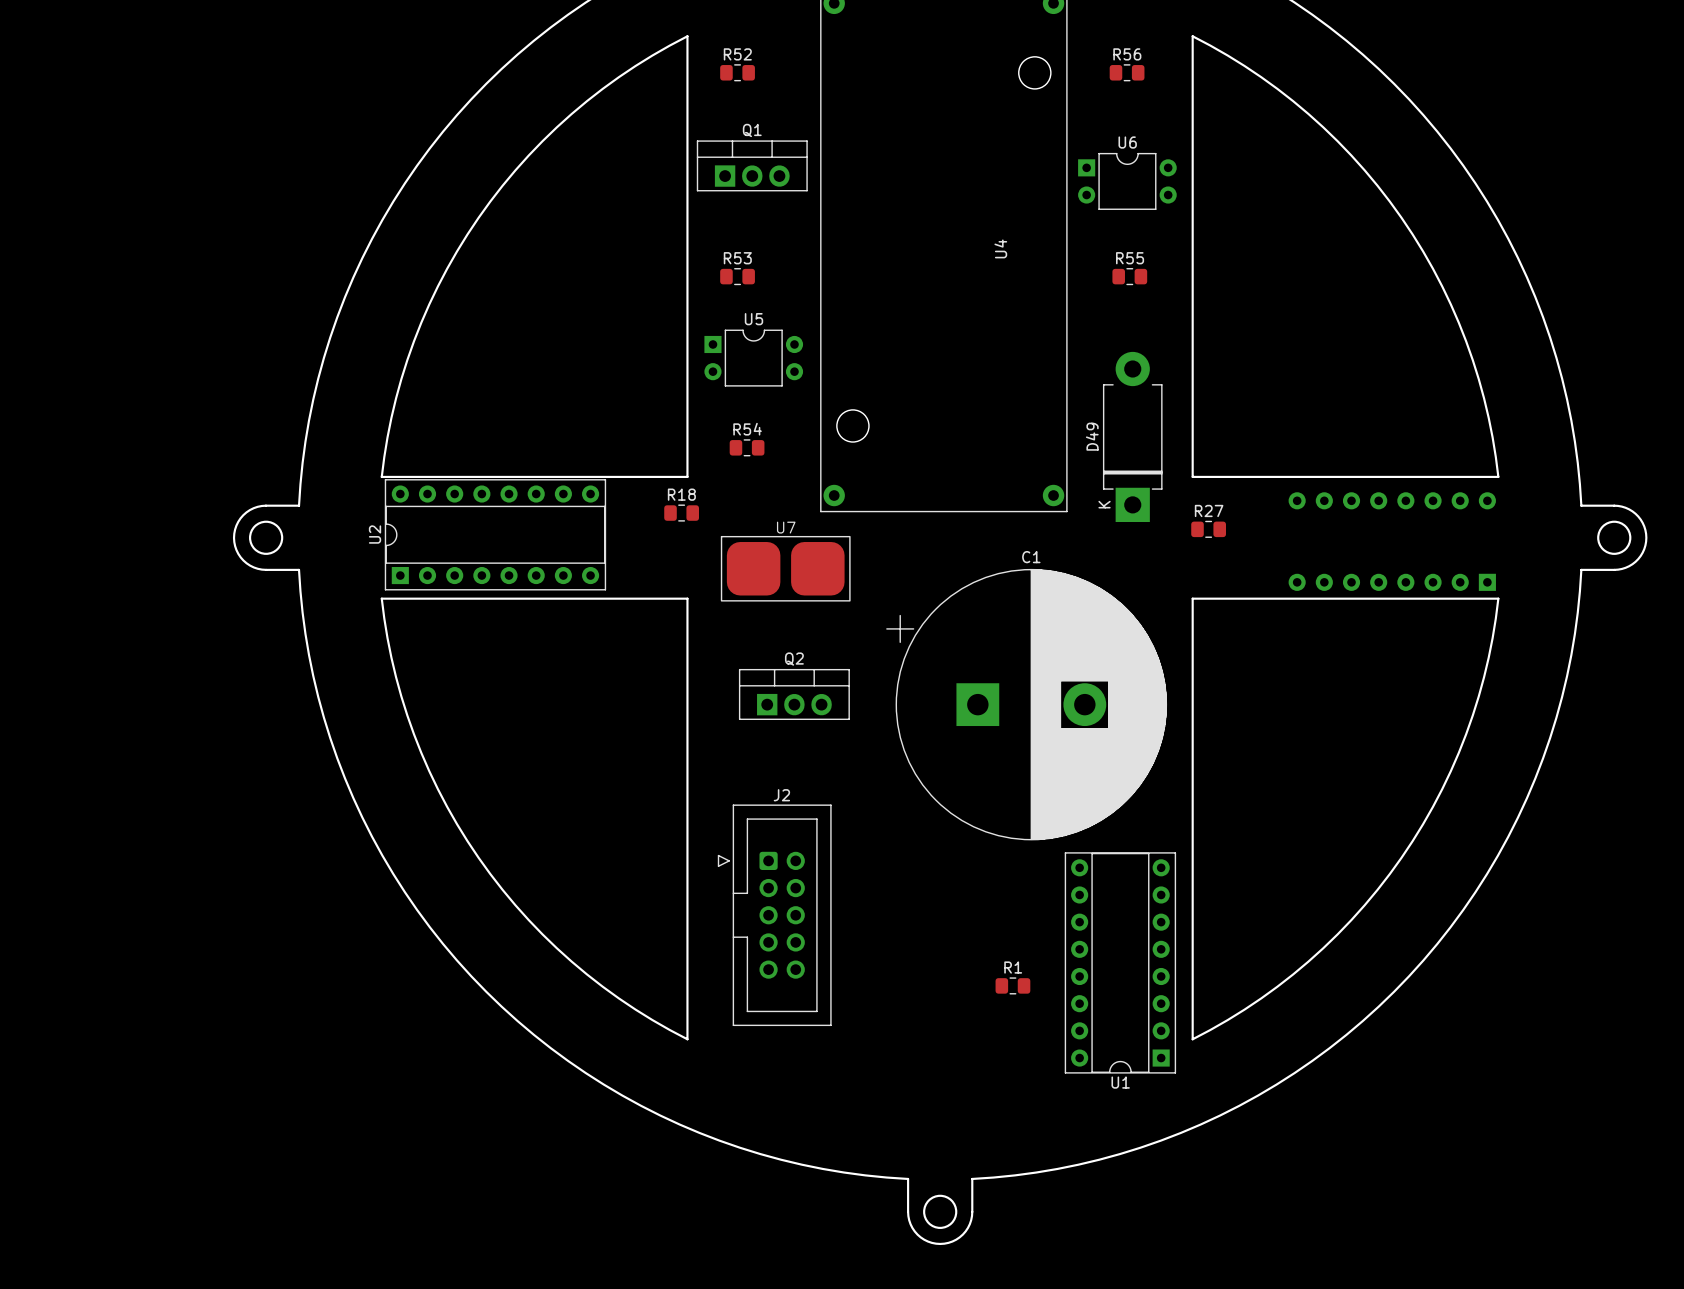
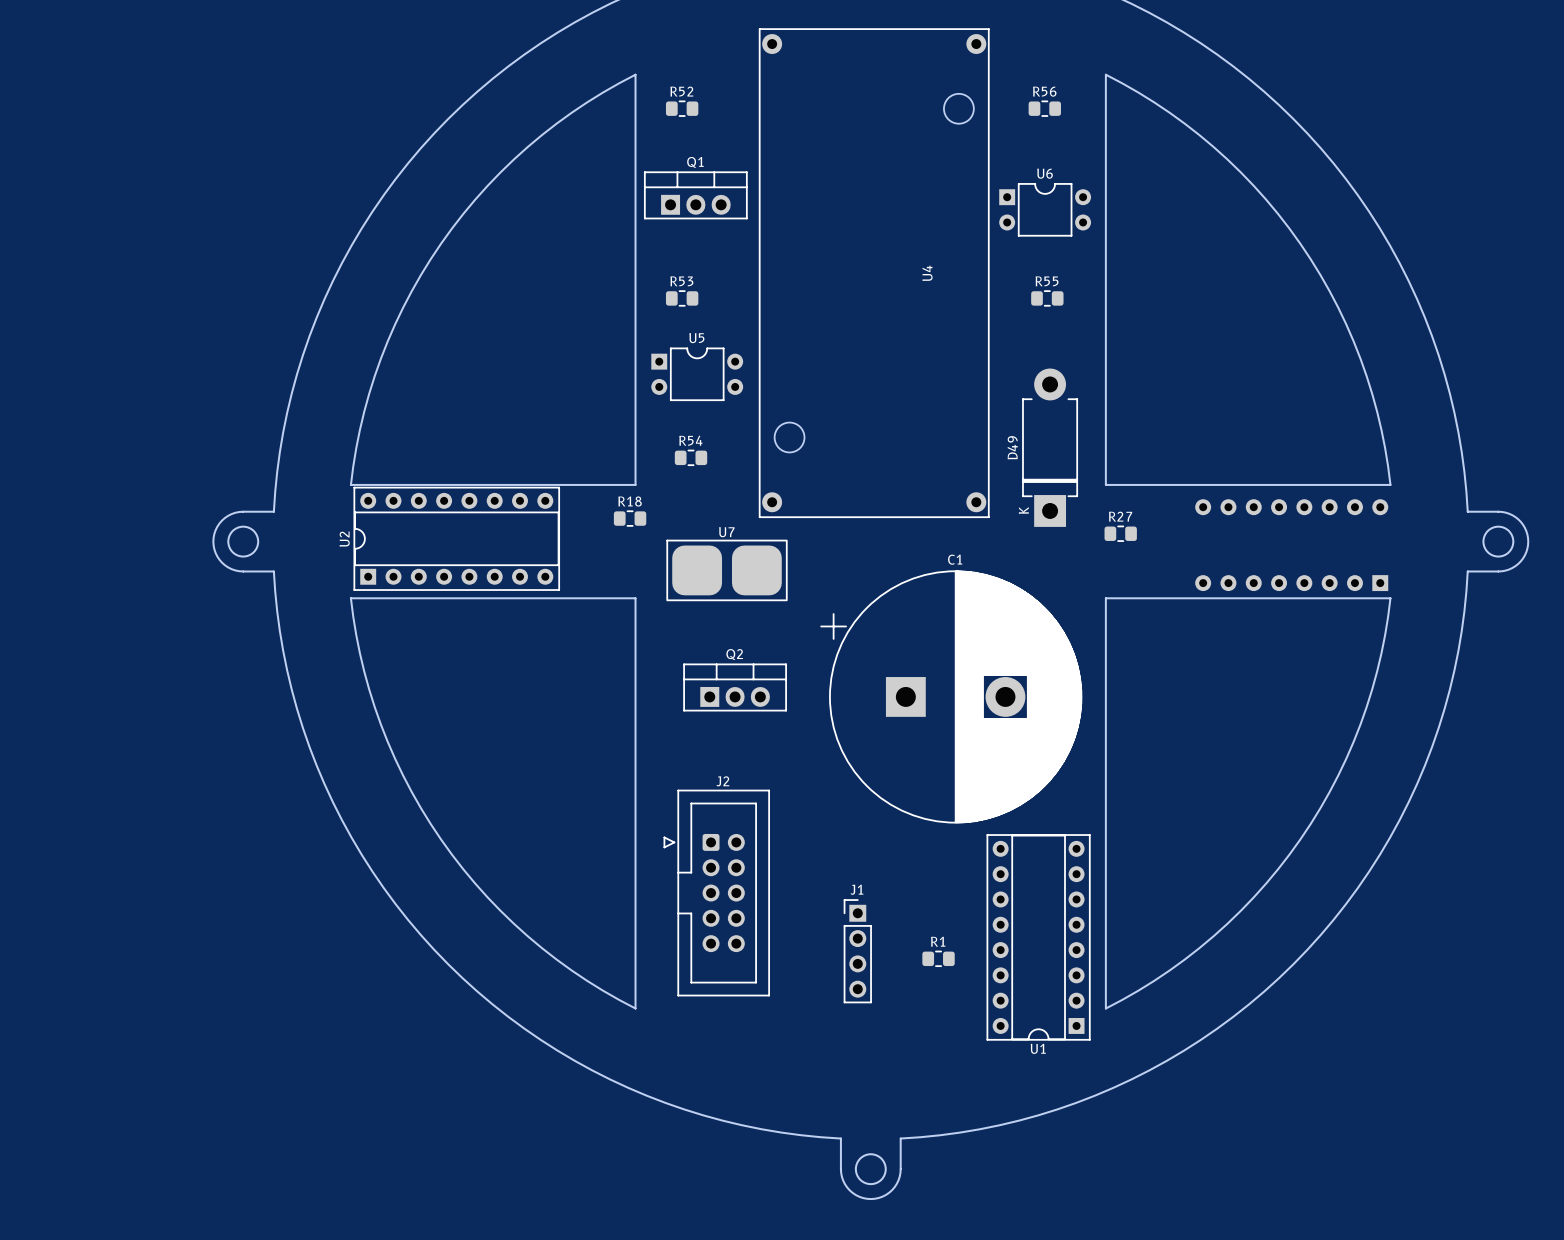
J1: none -> (857, 951)

